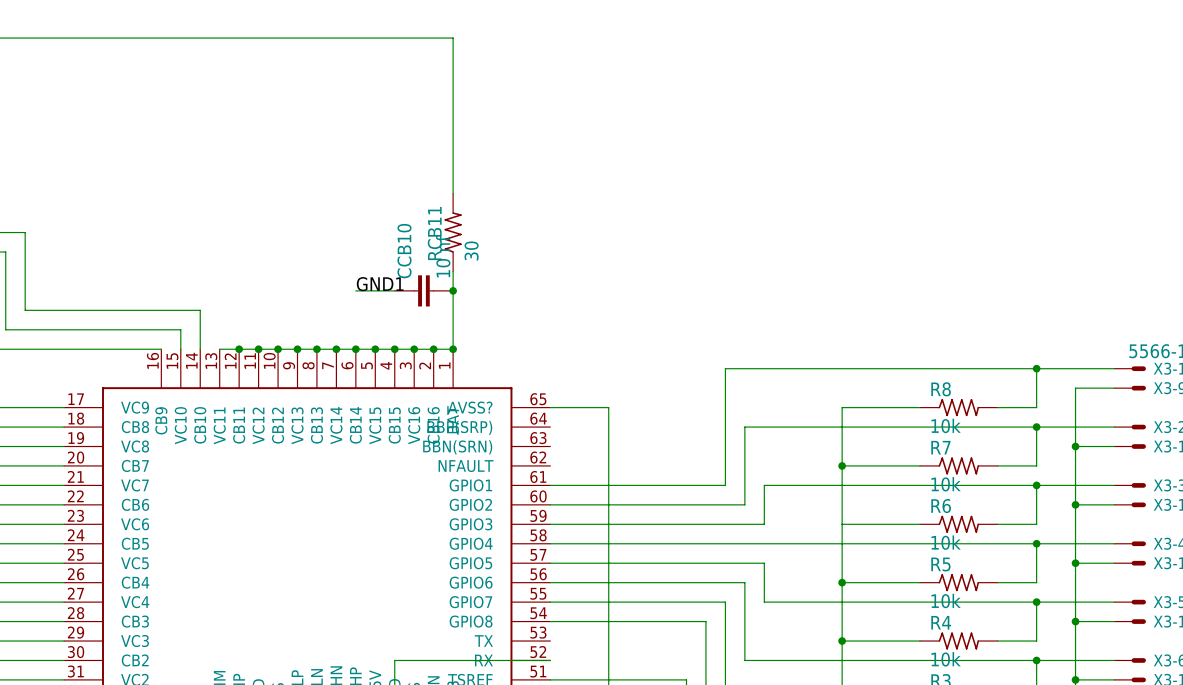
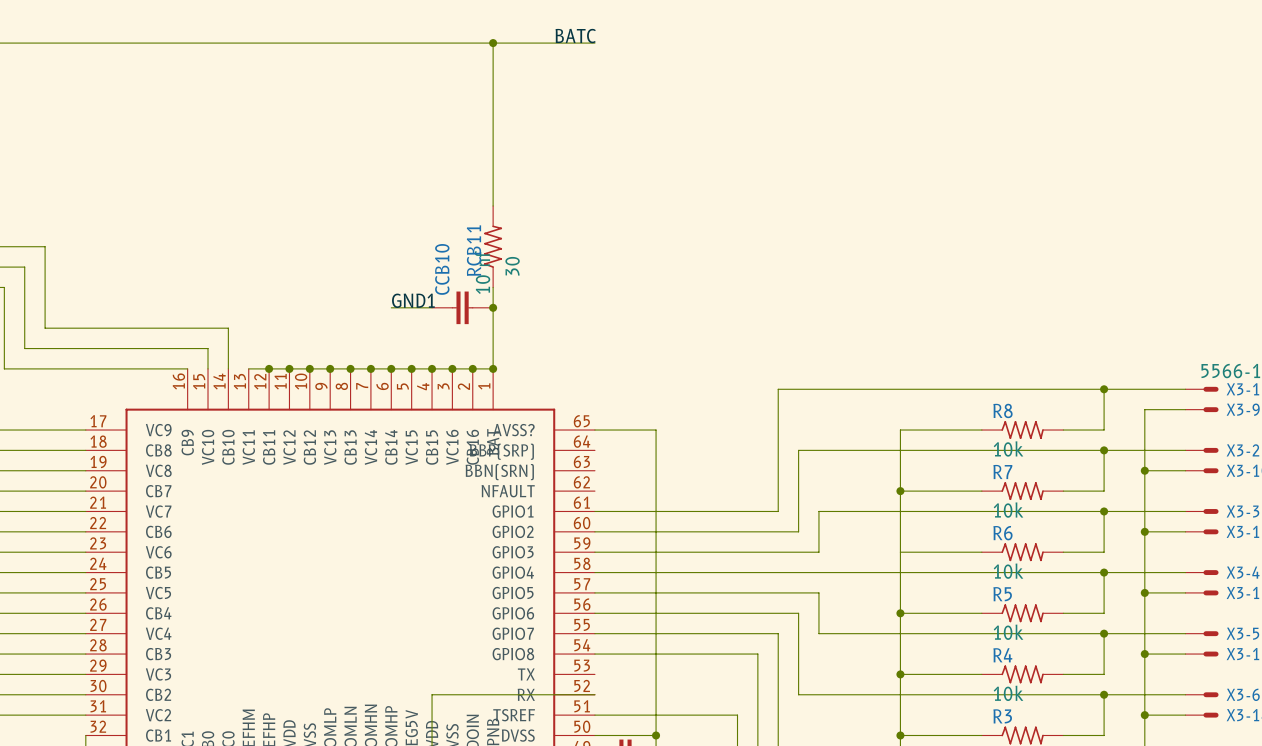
label: none -> BATC (575, 36)
wire: none -> (493, 43) (594, 43)
junction: none -> (493, 43)

